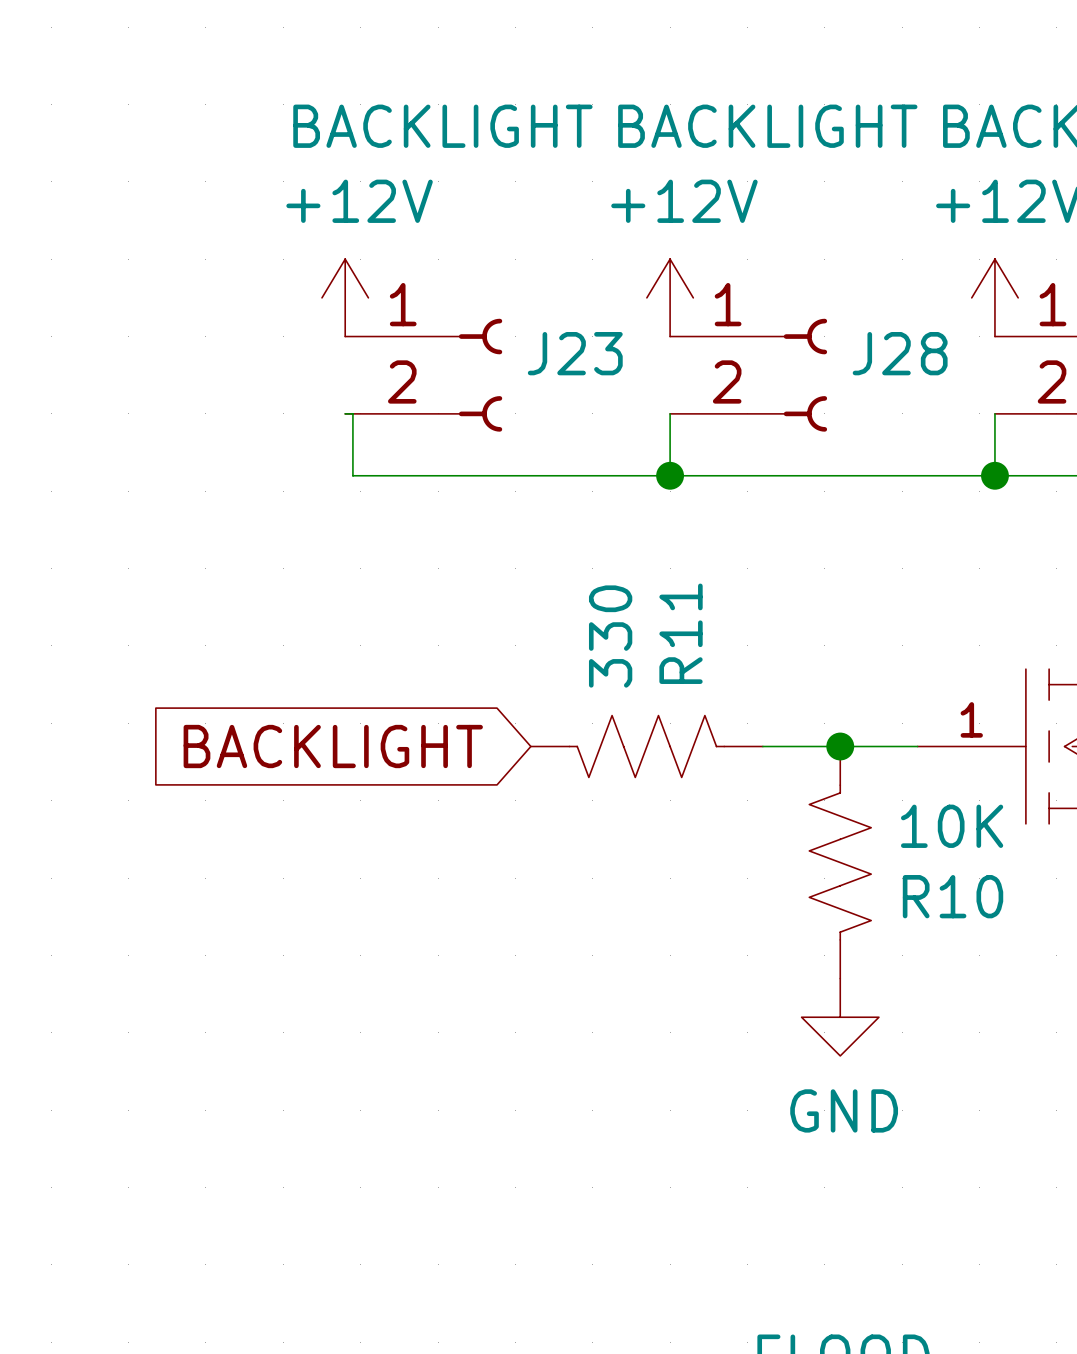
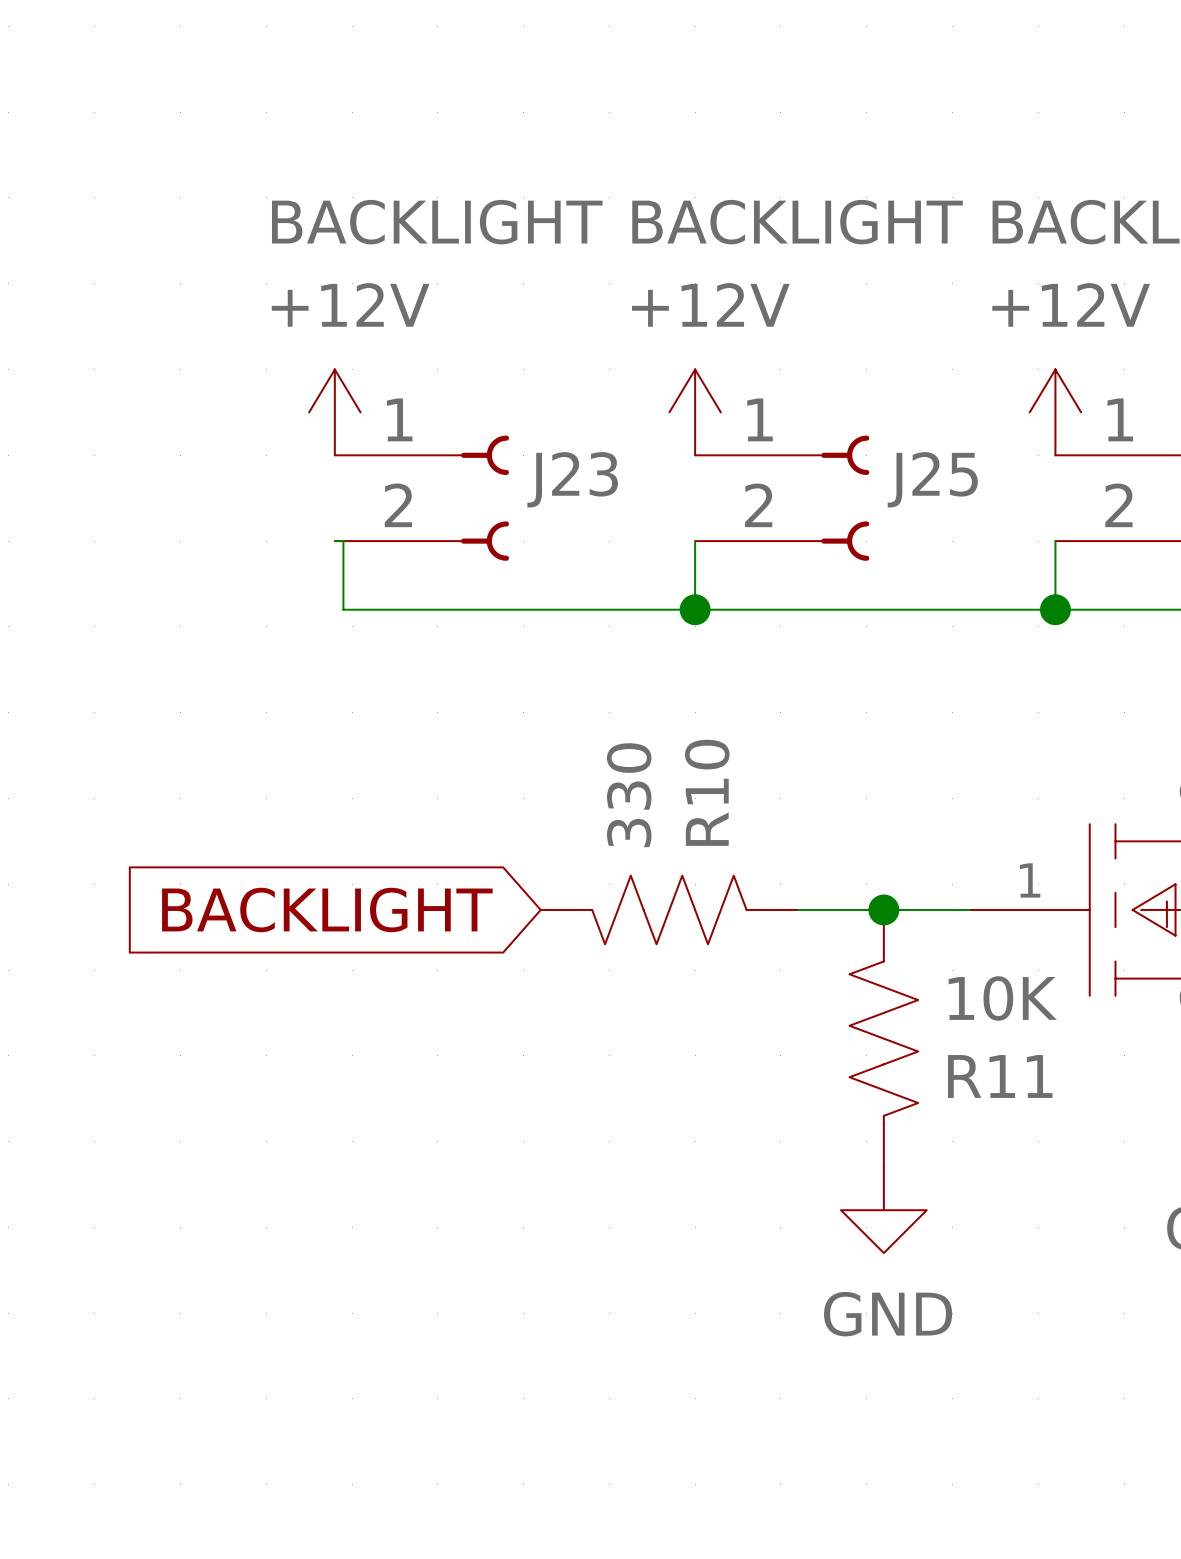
J28 name: J28 (900, 353) -> J25 (932, 479)
R11 name: R11 (681, 633) -> R10 (707, 792)
R10 name: R10 (953, 896) -> R11 (1000, 1076)

